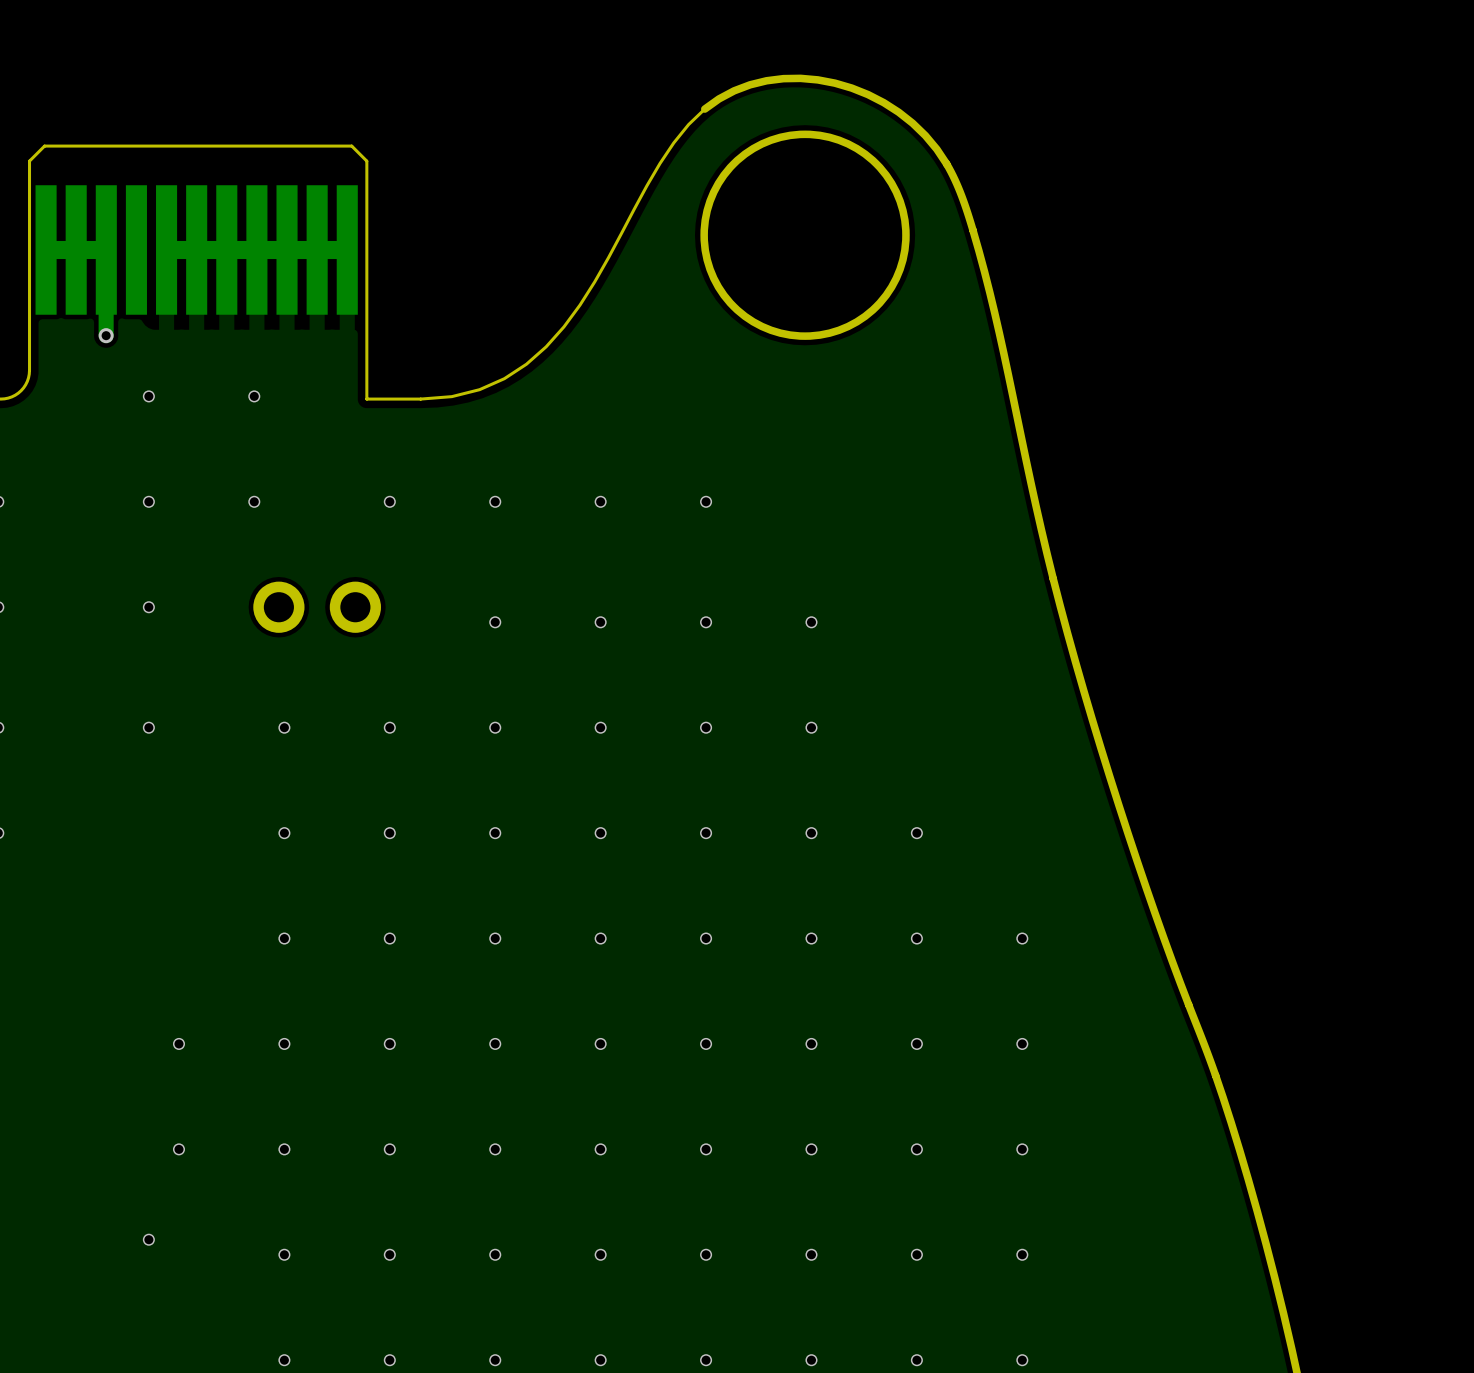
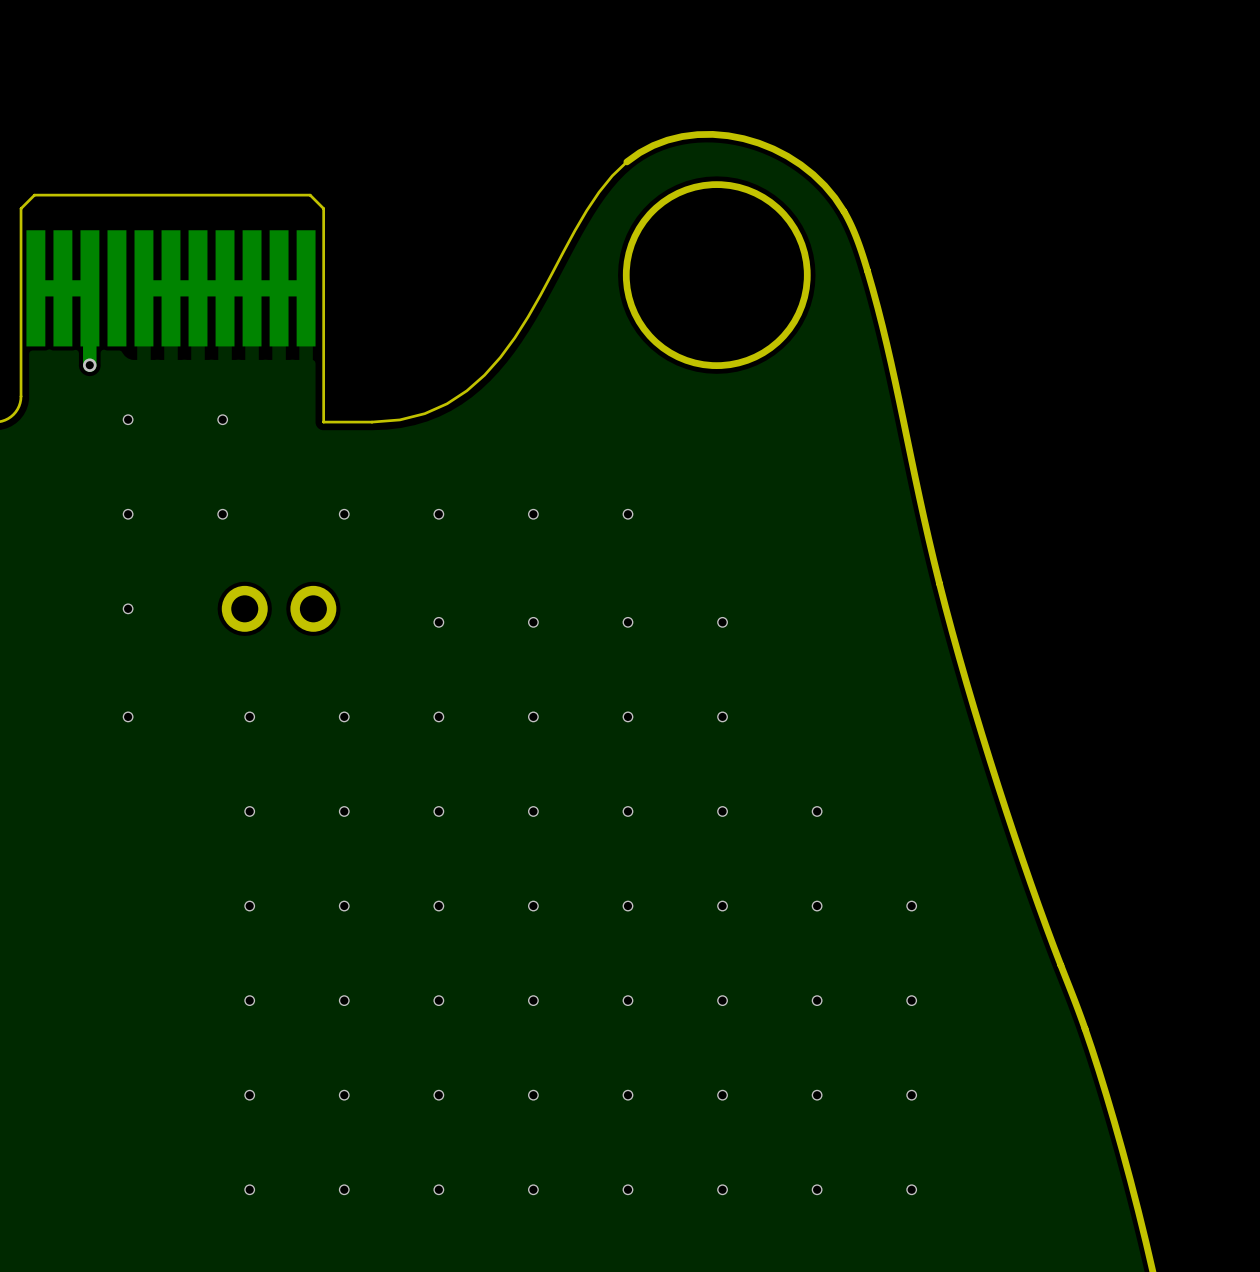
via: (178, 1043) -> none
via: (178, 1149) -> none
via: (148, 1239) -> none

